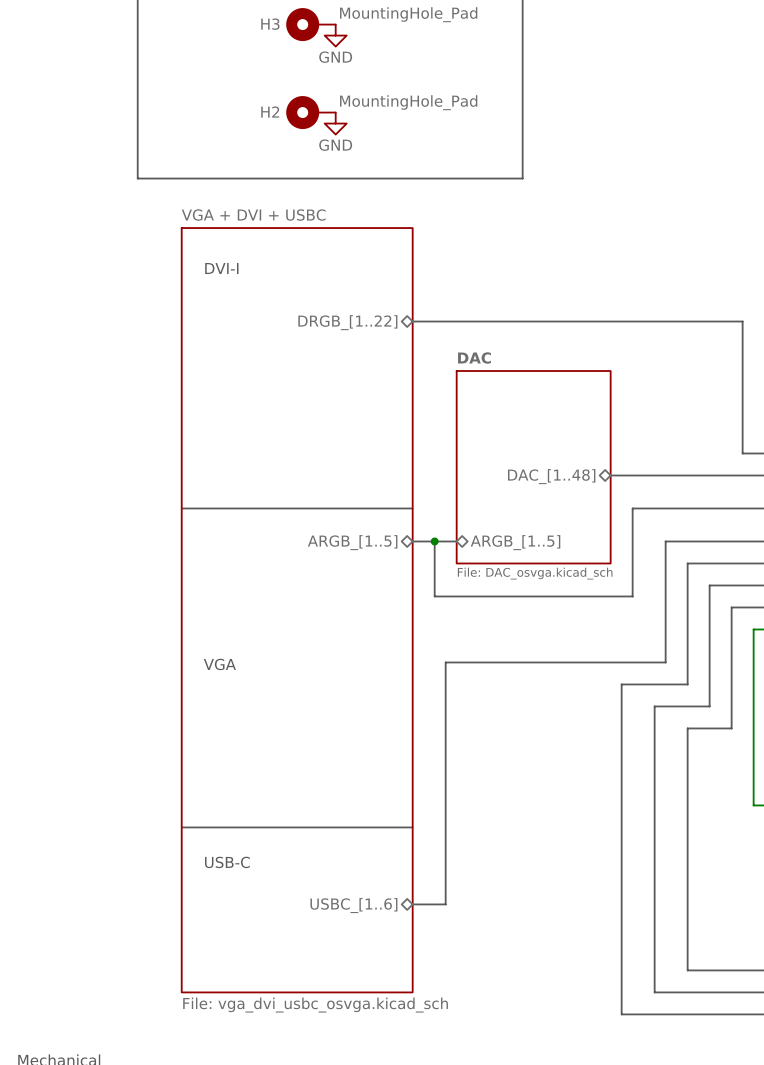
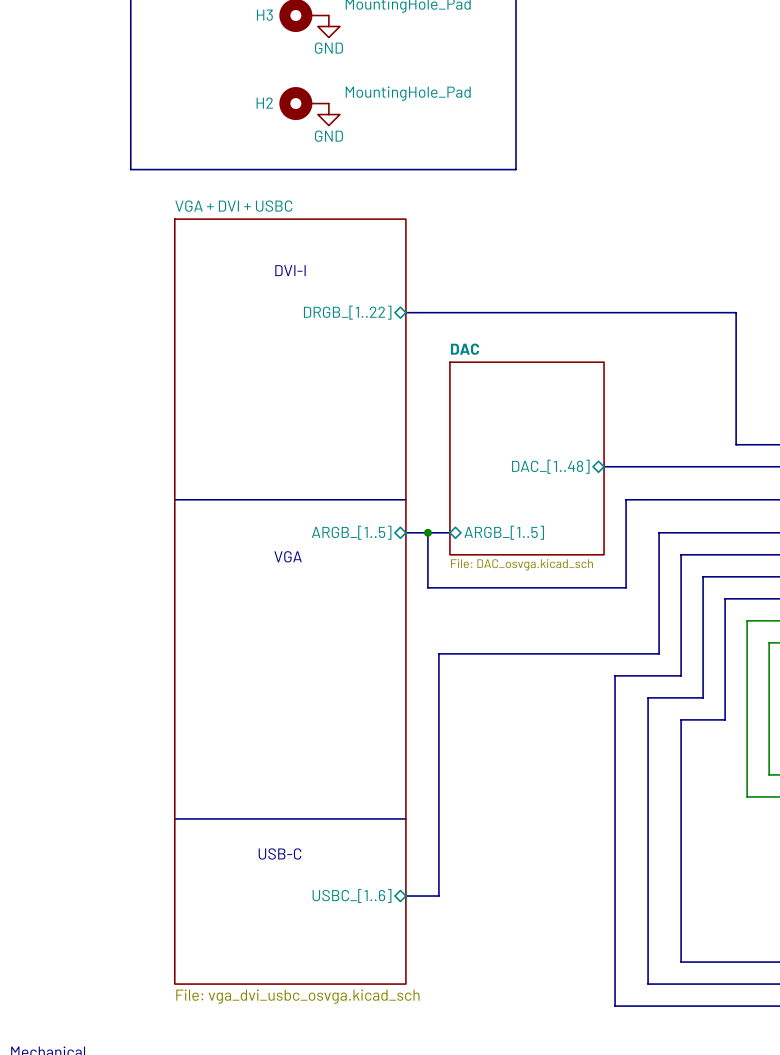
text position: DVI-I (221, 268) -> DVI-I (290, 270)
text position: VGA (219, 664) -> VGA (288, 556)
text position: USB-C (227, 862) -> USB-C (279, 853)

